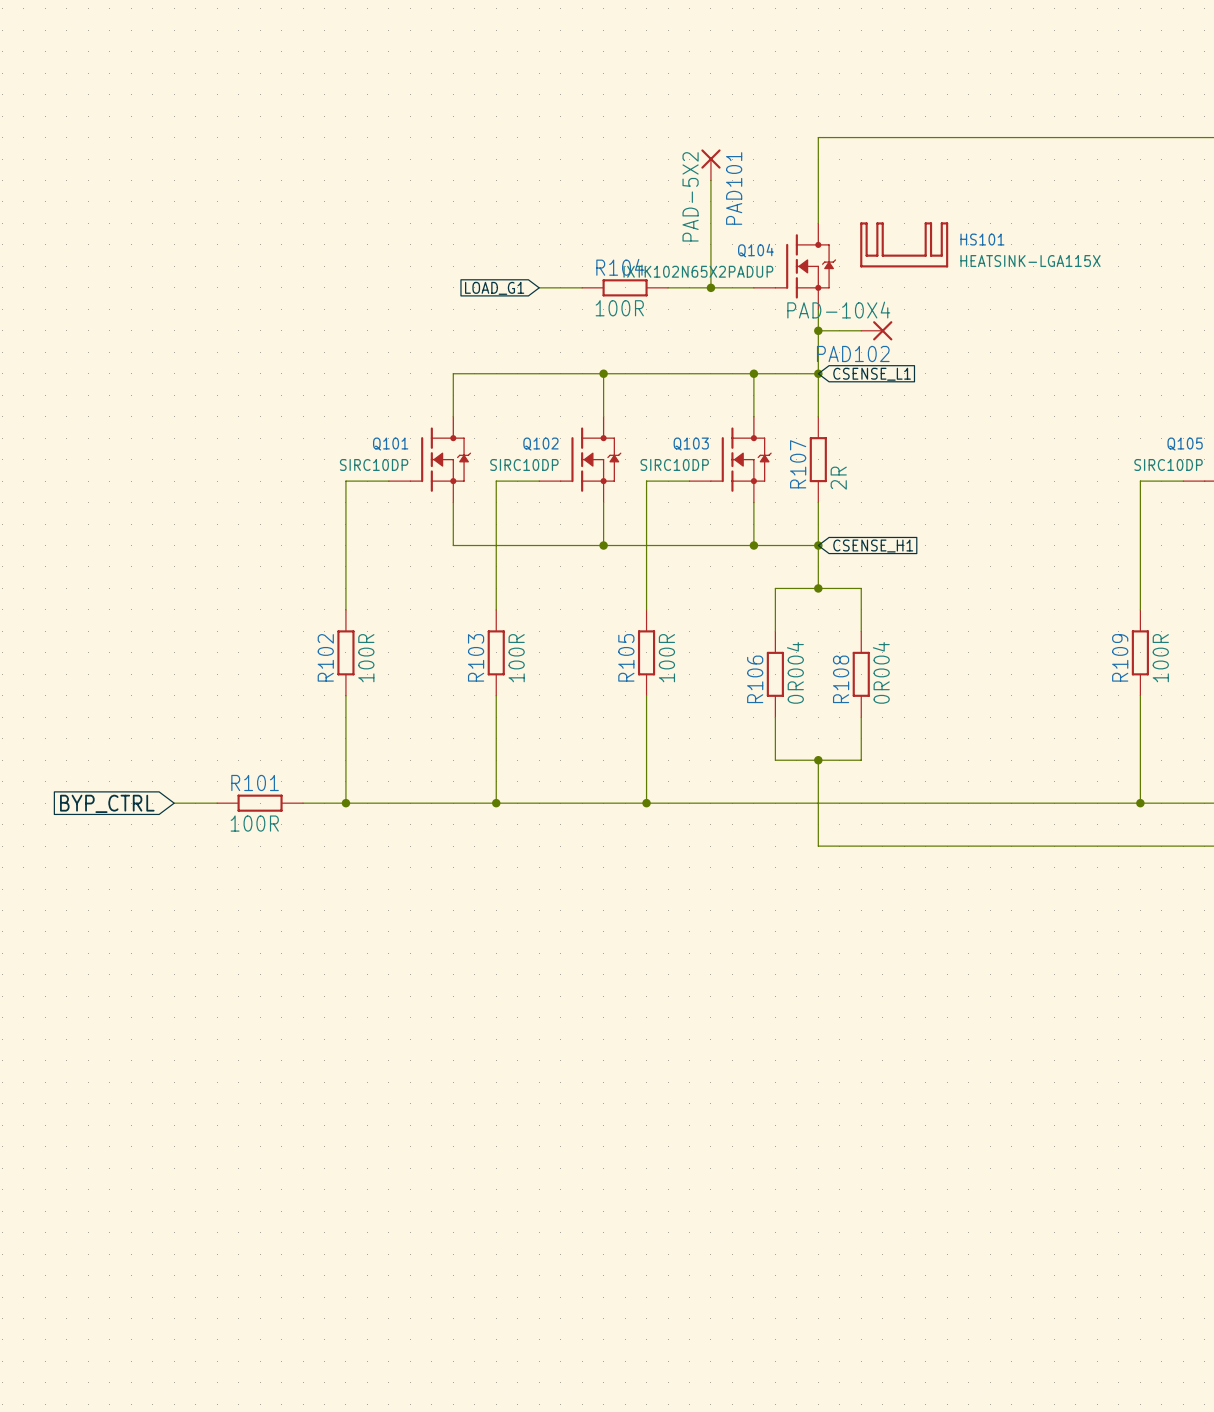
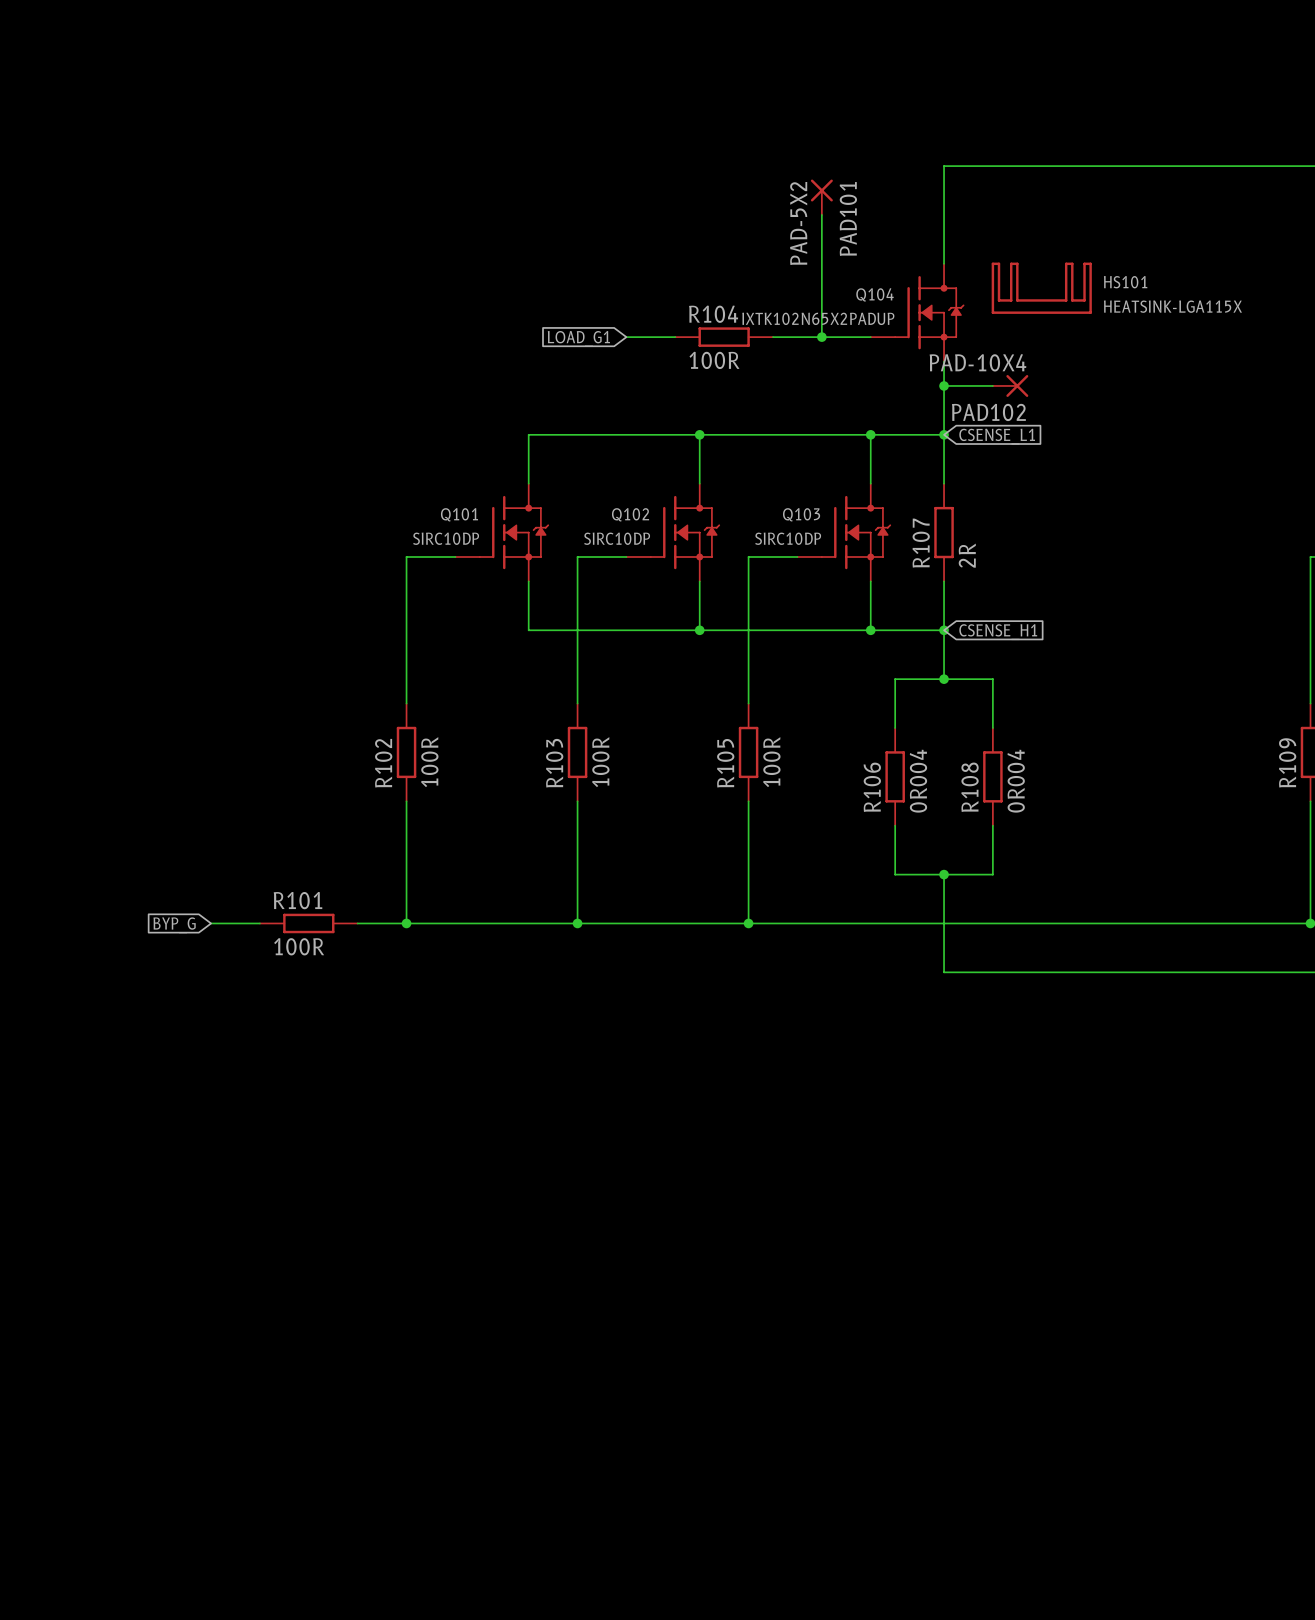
global label: BYP_CTRL (107, 803) -> BYP_G (174, 925)

